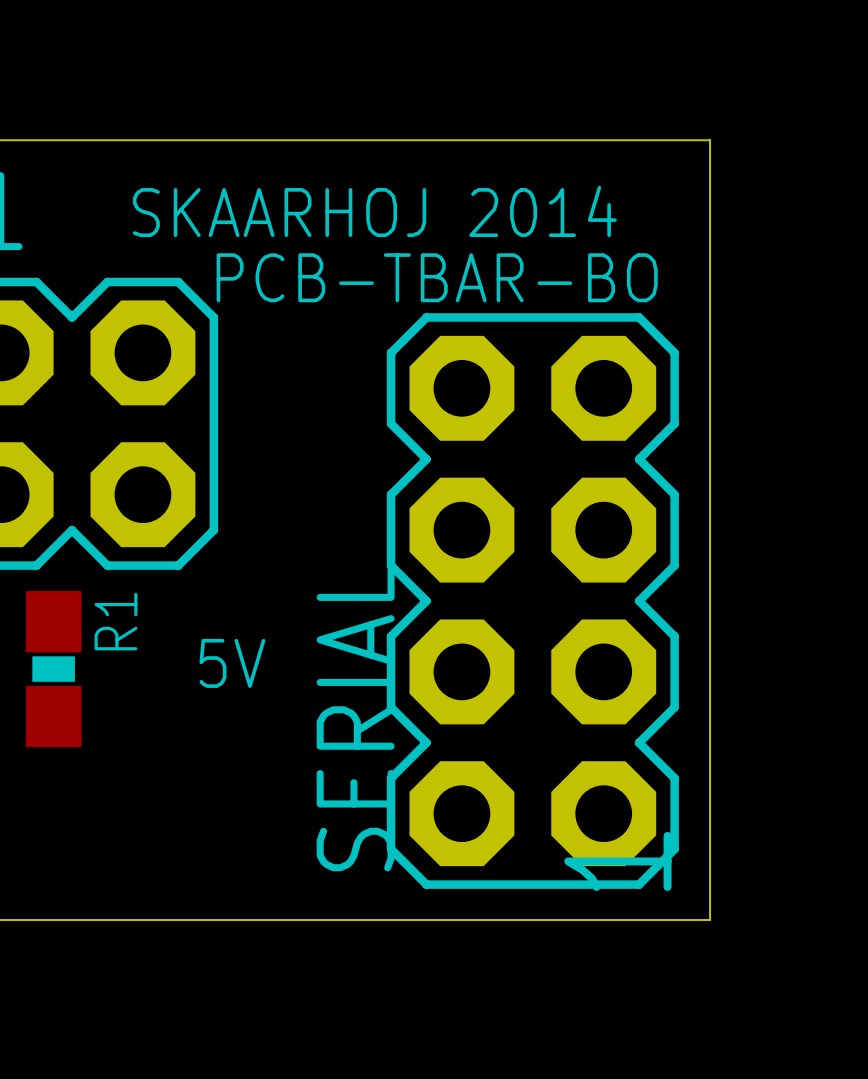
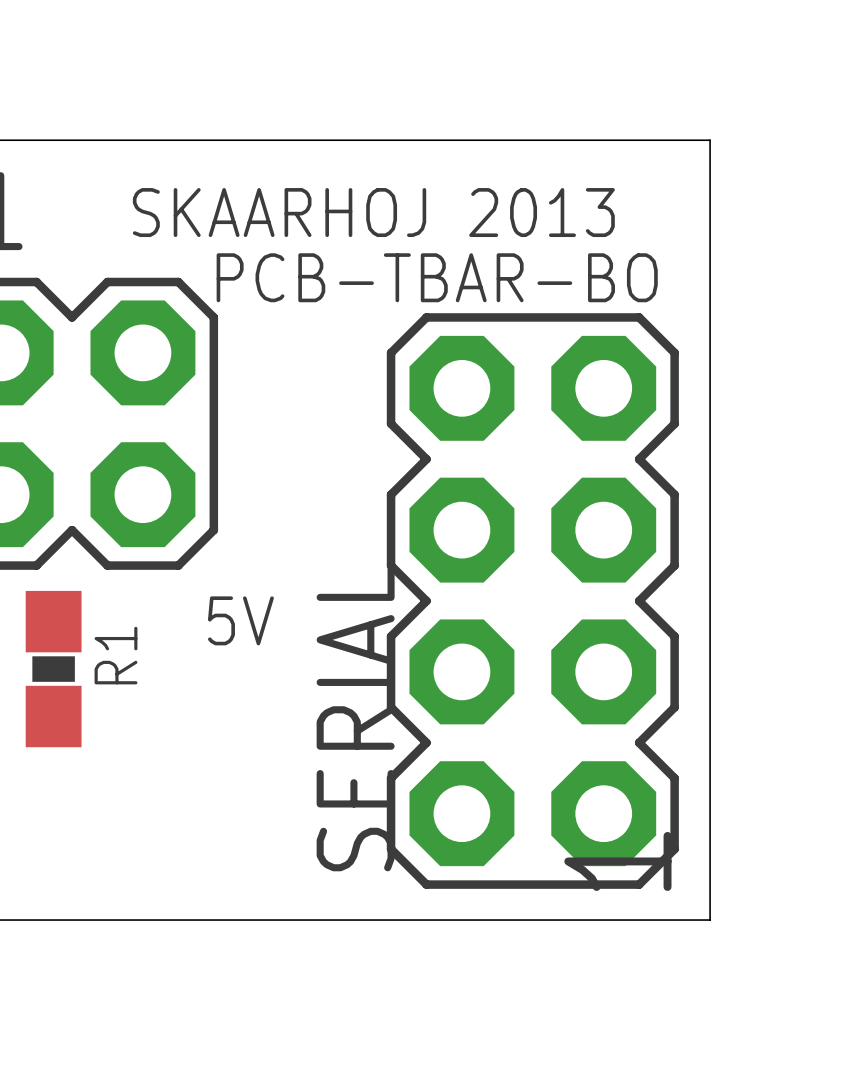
text: SKAARHOJ 2014 (374, 211) -> SKAARHOJ 2013 (373, 212)
R1 name position: R1 (116, 621) -> R1 (116, 655)
text position: 5V (232, 663) -> 5V (240, 620)

